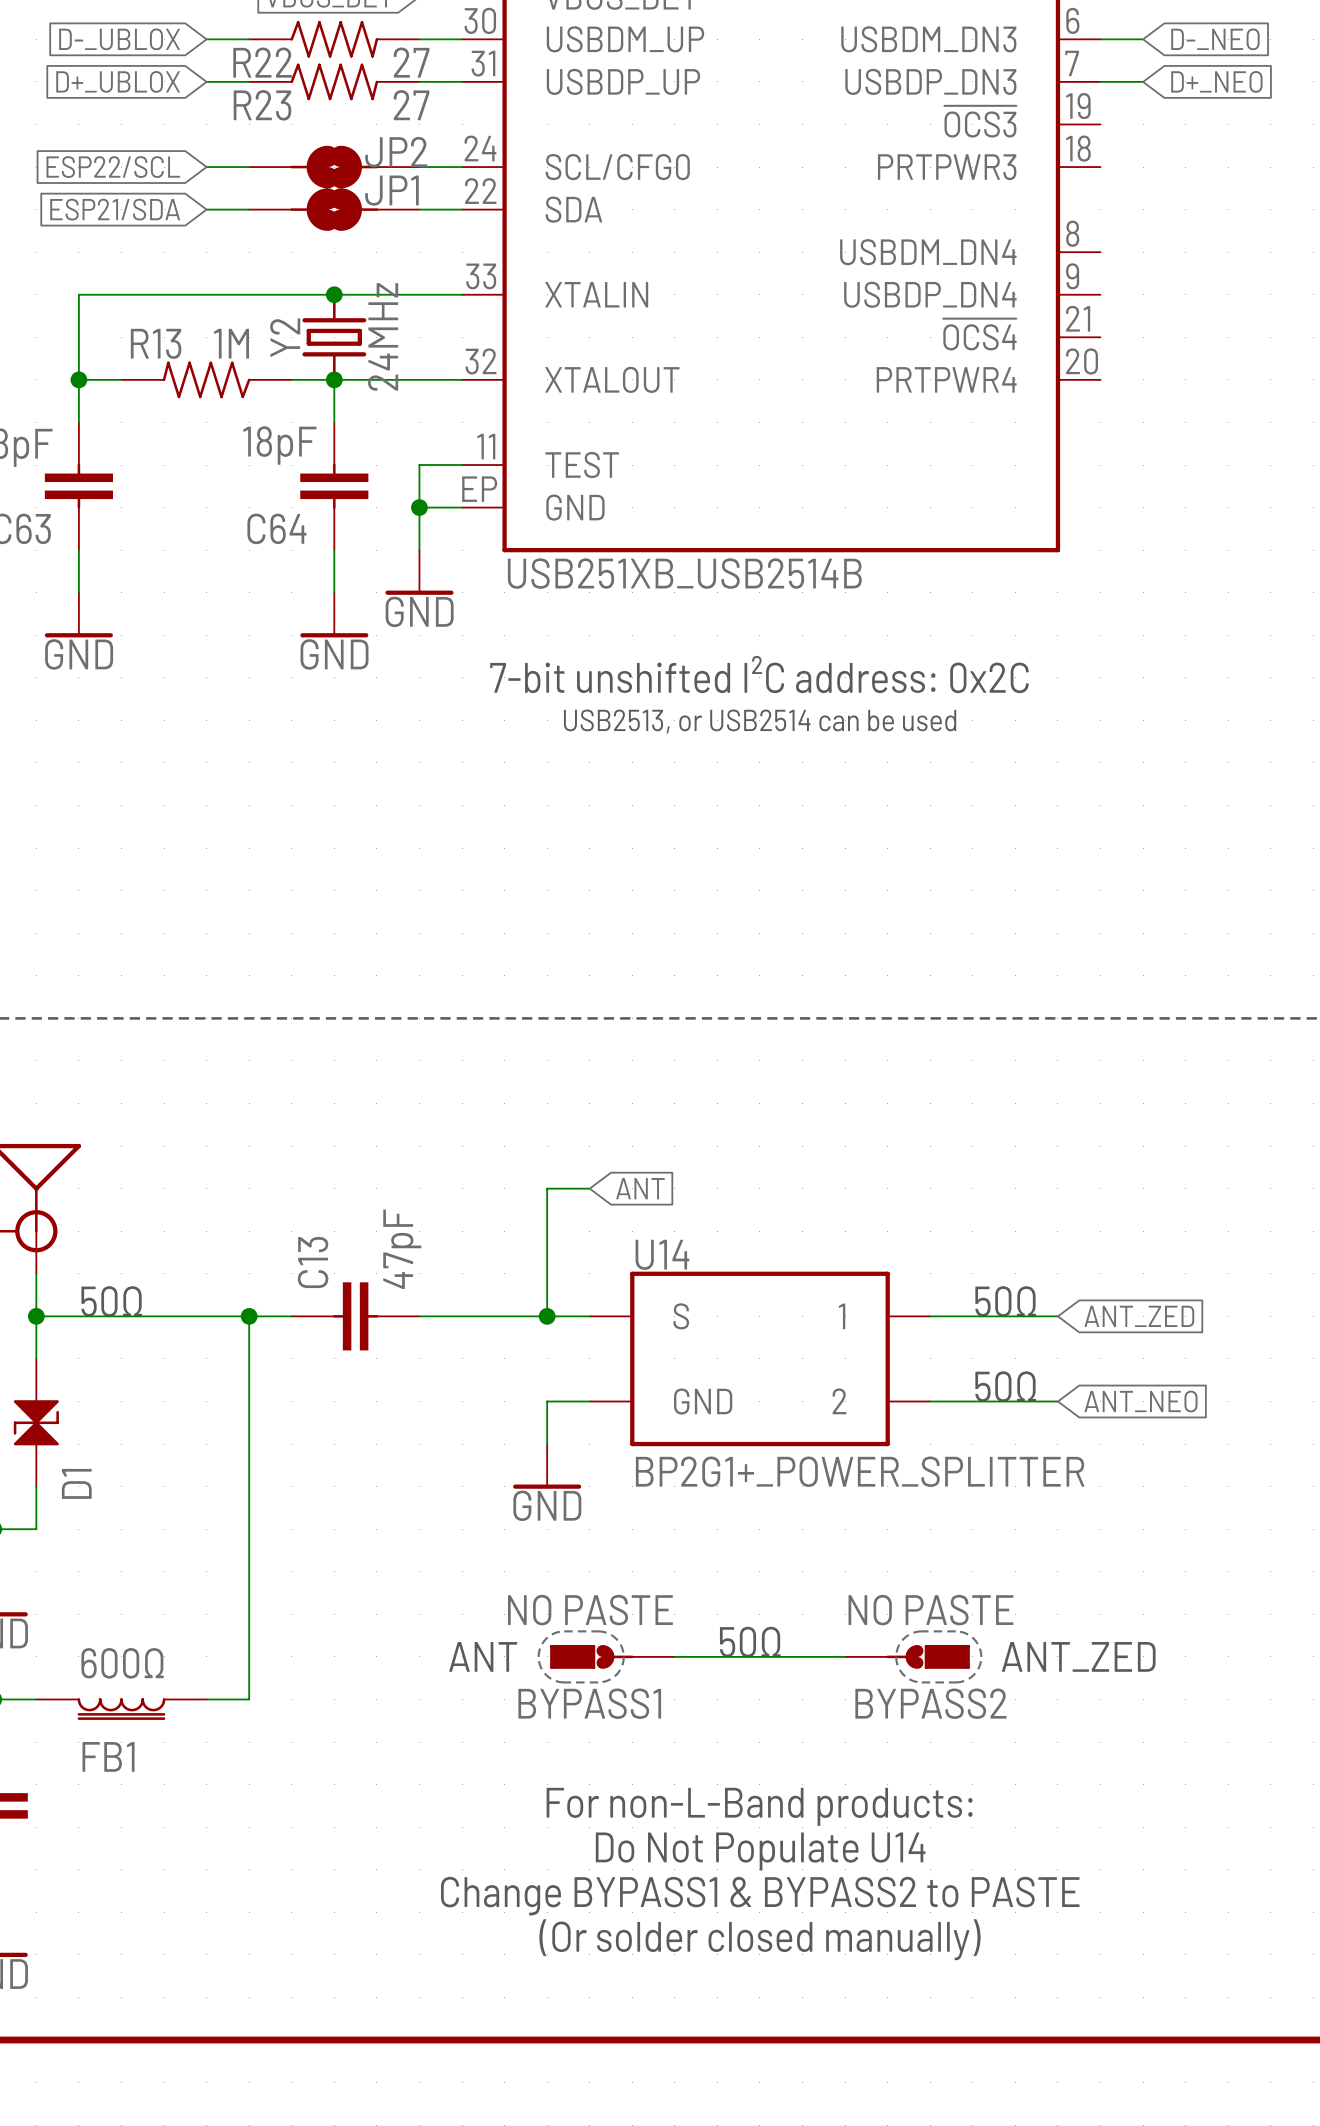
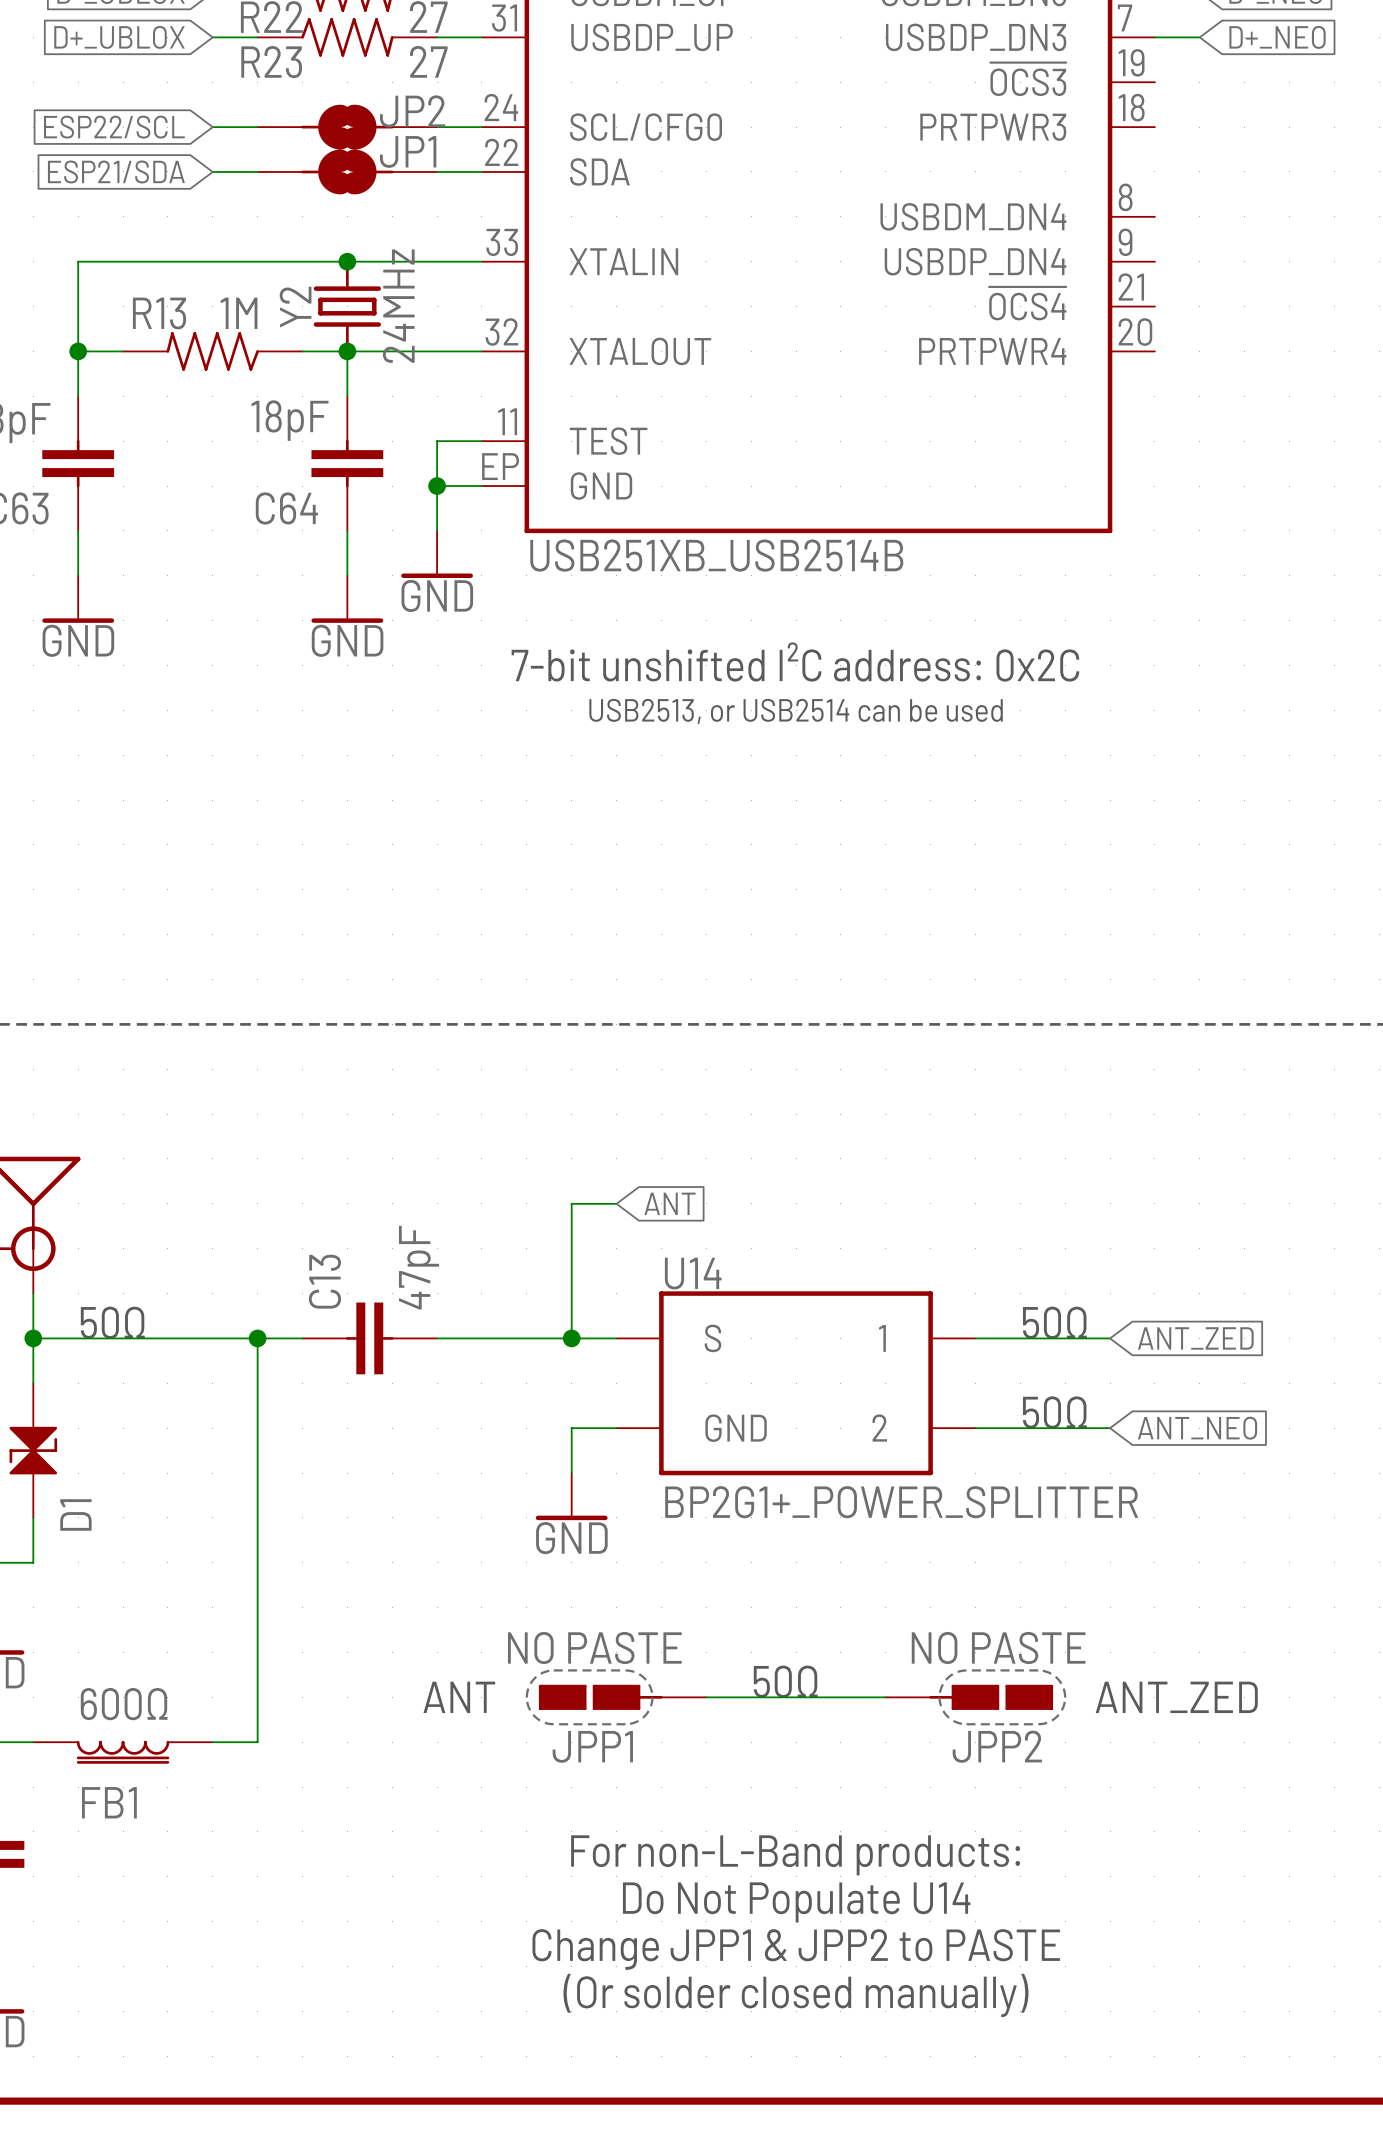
text position: ANT (483, 1656) -> ANT (459, 1697)
JPP1: none -> NO PASTE (615, 1697)
BYPASS1: NO PASTE (606, 1656) -> none
BYPASS2: NO PASTE (913, 1656) -> none
JPP2: none -> NO PASTE (976, 1697)
text position: ANT_ZED (1078, 1656) -> ANT_ZED (1176, 1697)
text: Change BYPASS1 & BYPASS2 to PASTE (760, 1896) -> Change JPP1 & JPP2 to PASTE (796, 1949)

